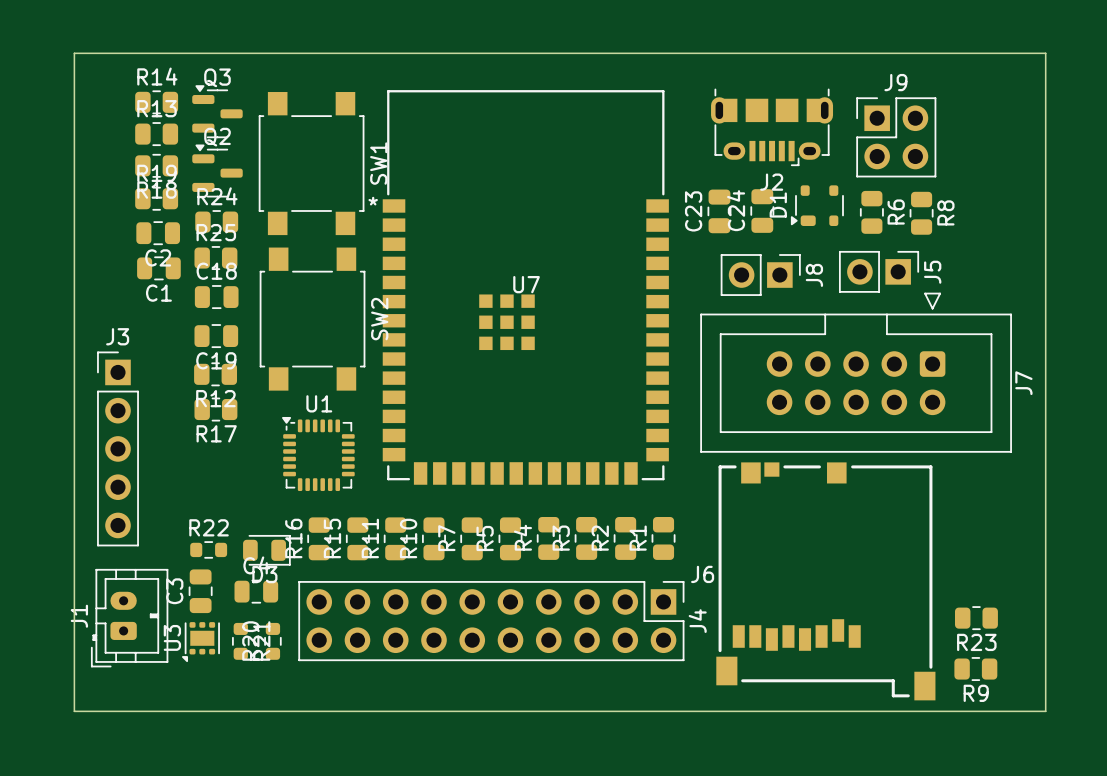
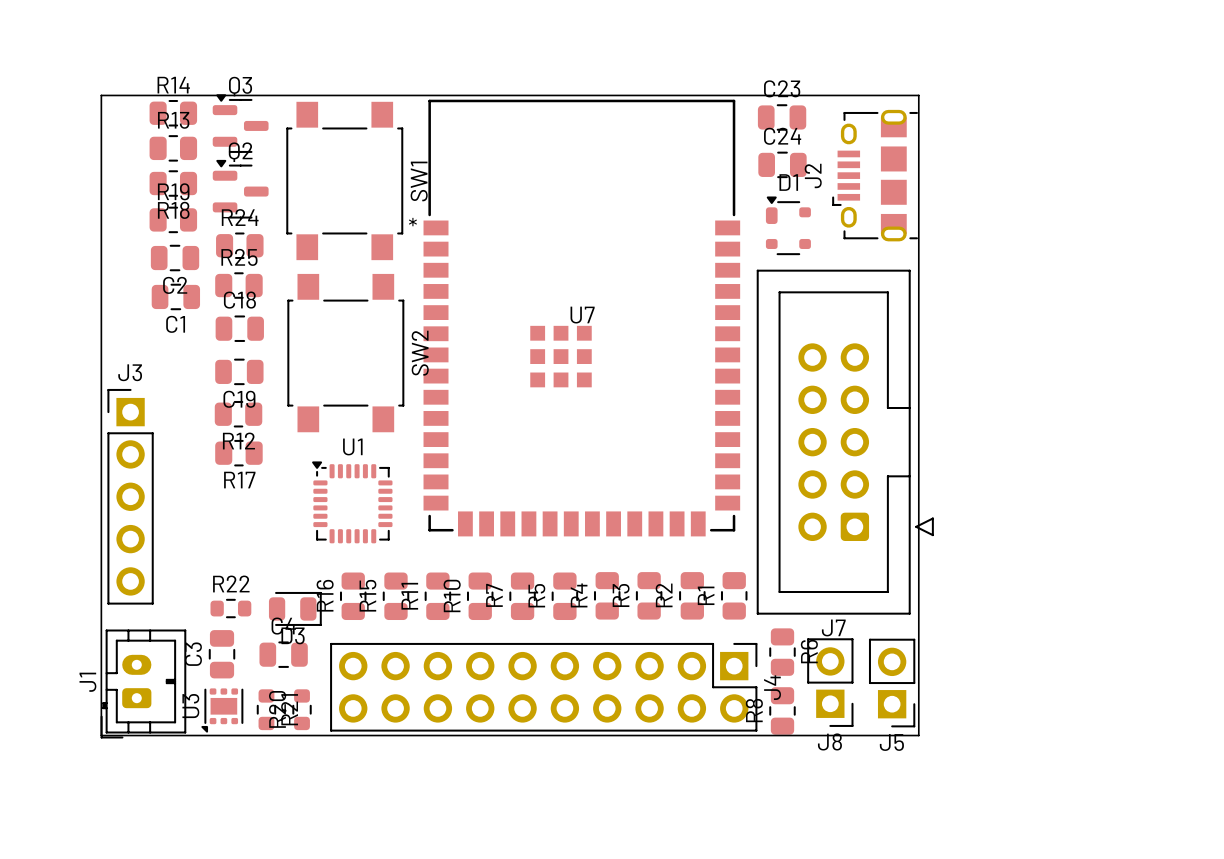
board edge: (74, 53) (1045, 53) (1045, 711) (74, 711) (74, 53) -> (101, 95) (101, 735) (918, 735) (918, 95) (101, 95)
J2 footprint: [711, 88, 834, 167] -> [832, 109, 918, 242]
J9: (896, 137) -> none
J2 name position: J2 (771, 182) -> J2 (813, 175)
D1 rotation: 0° (817, 205) -> 90° clockwise (788, 225)
D1 position: (817, 205) -> (788, 225)
C23 rotation: 0° (719, 211) -> 90° clockwise (782, 117)
C23 position: (719, 211) -> (782, 117)
C24 rotation: 0° (762, 211) -> 90° clockwise (782, 164)
C24 position: (762, 211) -> (782, 164)
R6 position: (871, 212) -> (782, 652)
R8 name position: R8 (945, 212) -> R8 (754, 710)
R8 position: (921, 213) -> (782, 710)
J5 rotation: 0° (879, 271) -> 90° clockwise (892, 683)
J5 position: (879, 271) -> (892, 683)
J8 rotation: 0° (760, 275) -> 90° clockwise (830, 682)
J8 position: (760, 275) -> (830, 682)
J7 rotation: 0° (856, 372) -> 90° clockwise (845, 442)
J6: (825, 581) -> none
R23: (976, 618) -> none
R9: (975, 669) -> none

